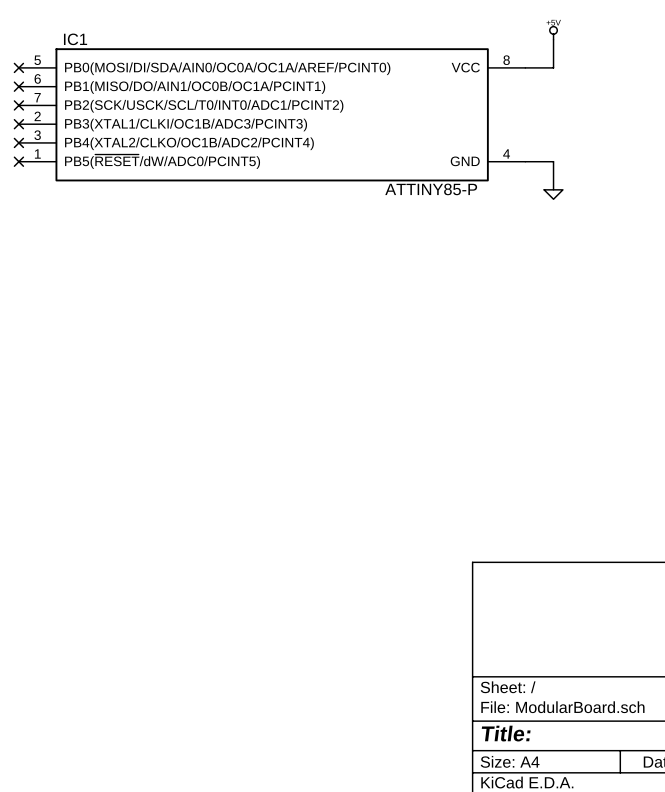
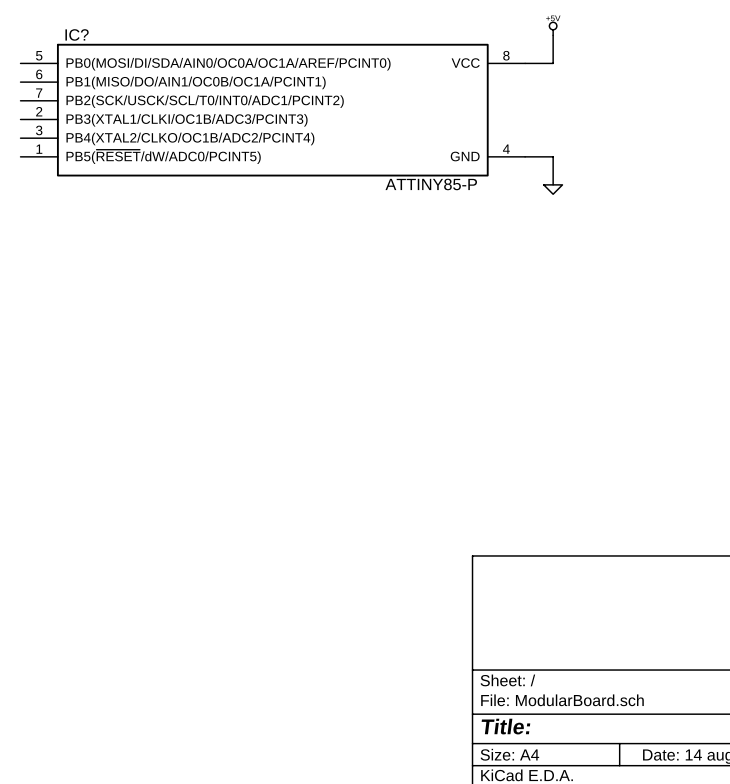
IC1 name: IC1 (75, 39) -> IC? (77, 34)
no-connect mark: (18, 67) -> none
no-connect mark: (18, 86) -> none
no-connect mark: (18, 105) -> none
no-connect mark: (18, 124) -> none
no-connect mark: (18, 142) -> none
no-connect mark: (18, 161) -> none

